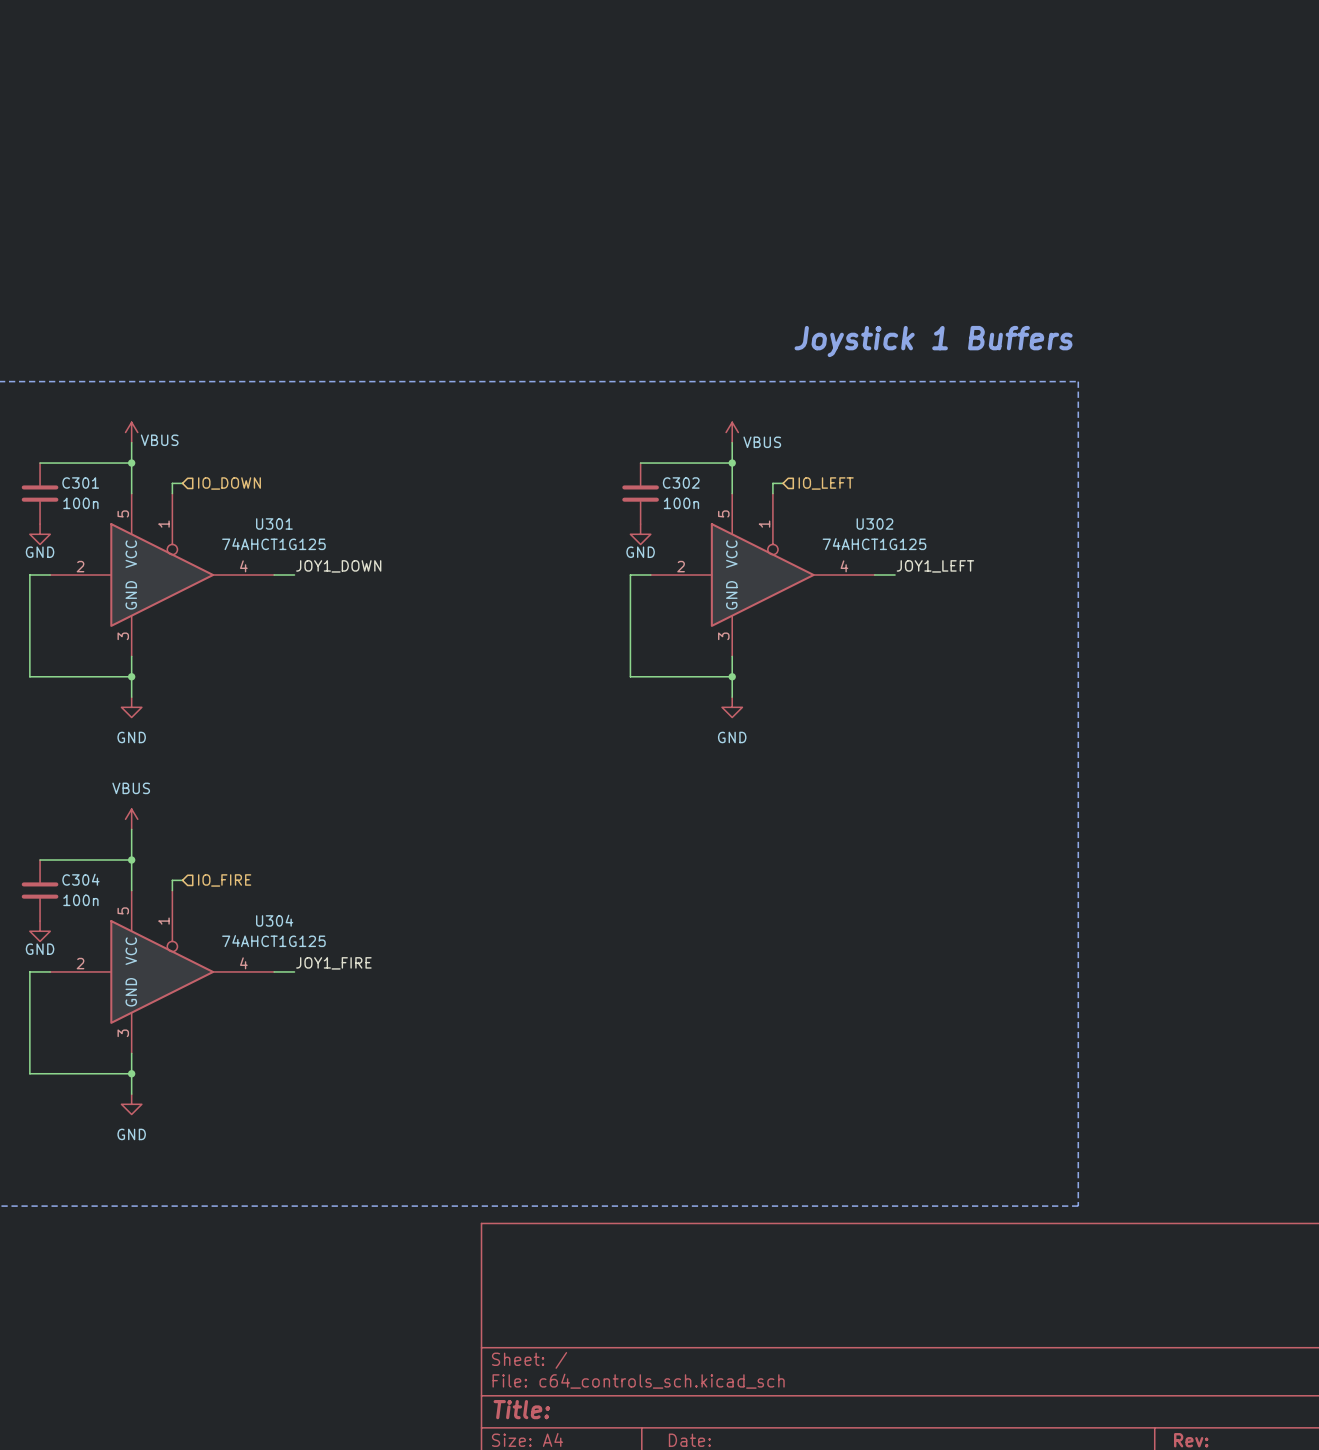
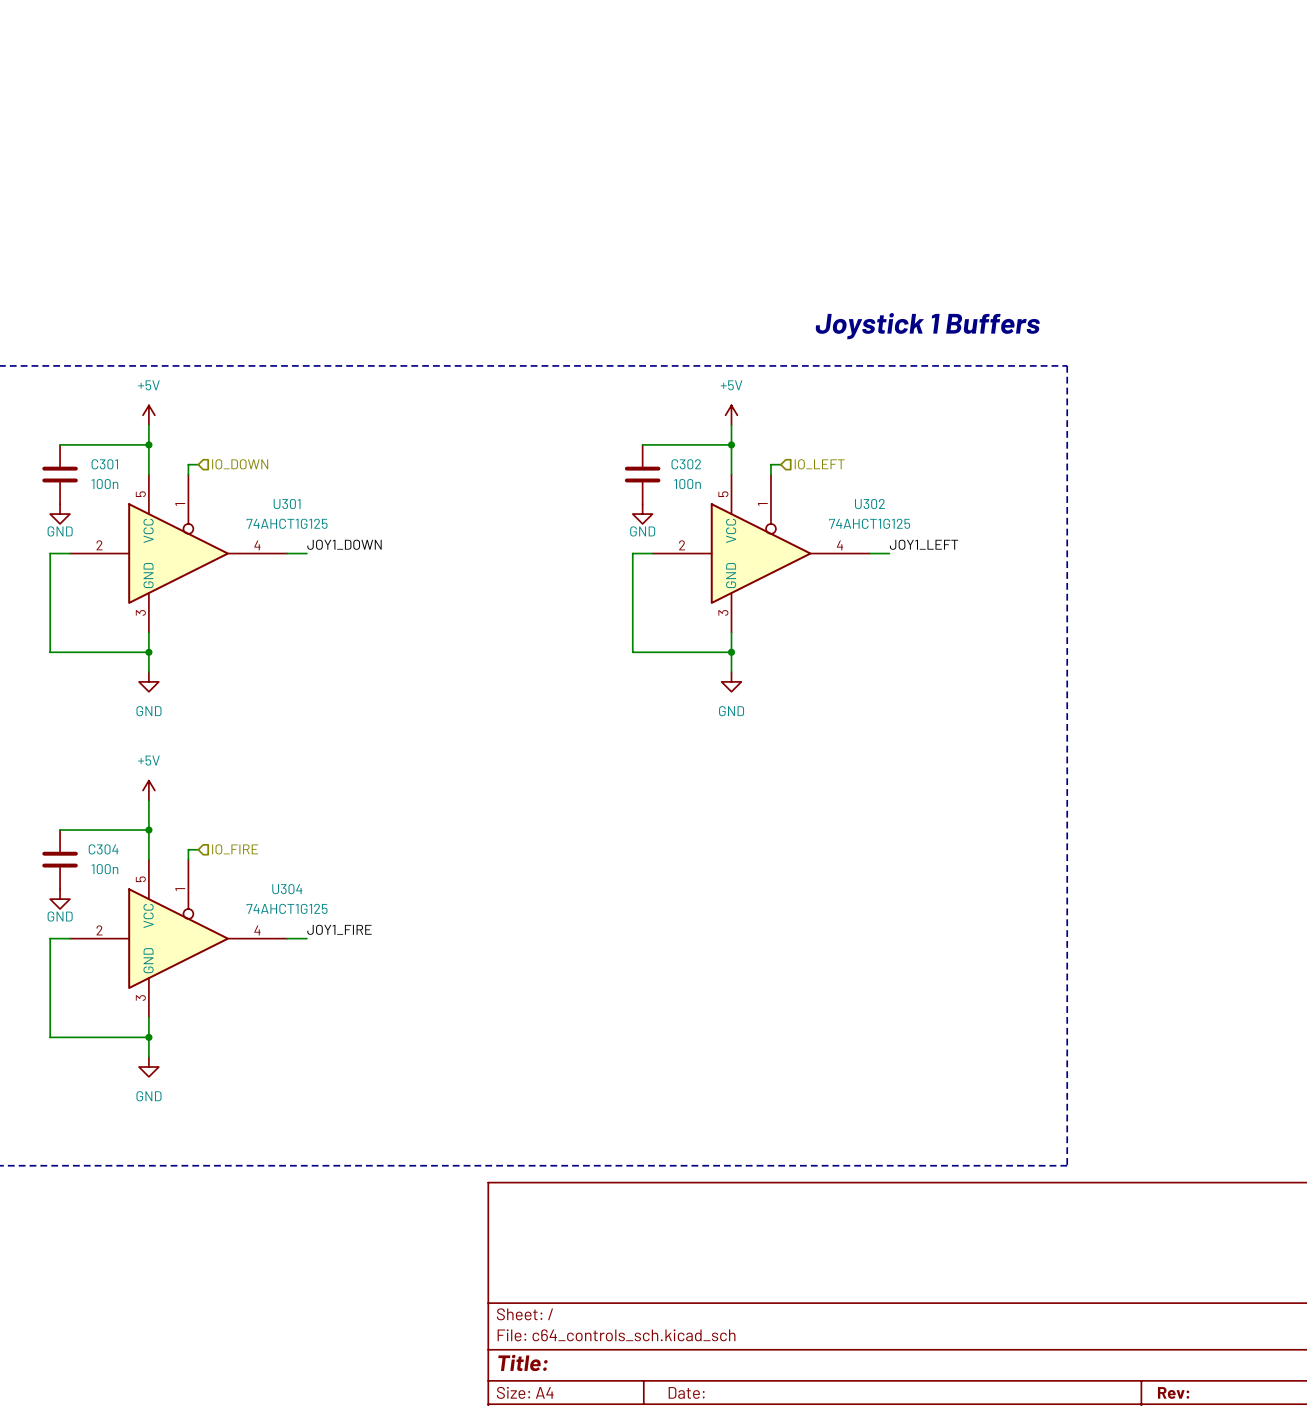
power symbol: VBUS (131, 432) -> +5V (148, 415)
power symbol: VBUS (732, 432) -> +5V (731, 415)
power symbol: VBUS (131, 819) -> +5V (148, 790)

